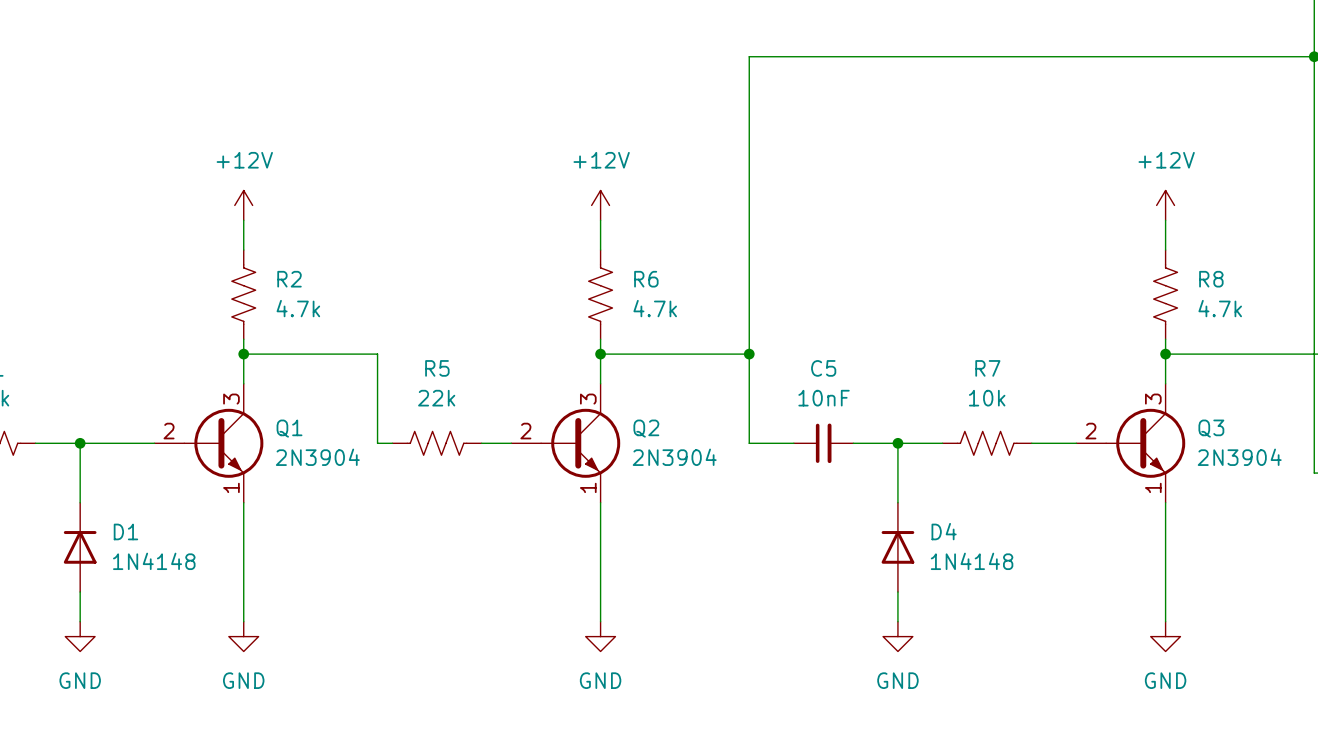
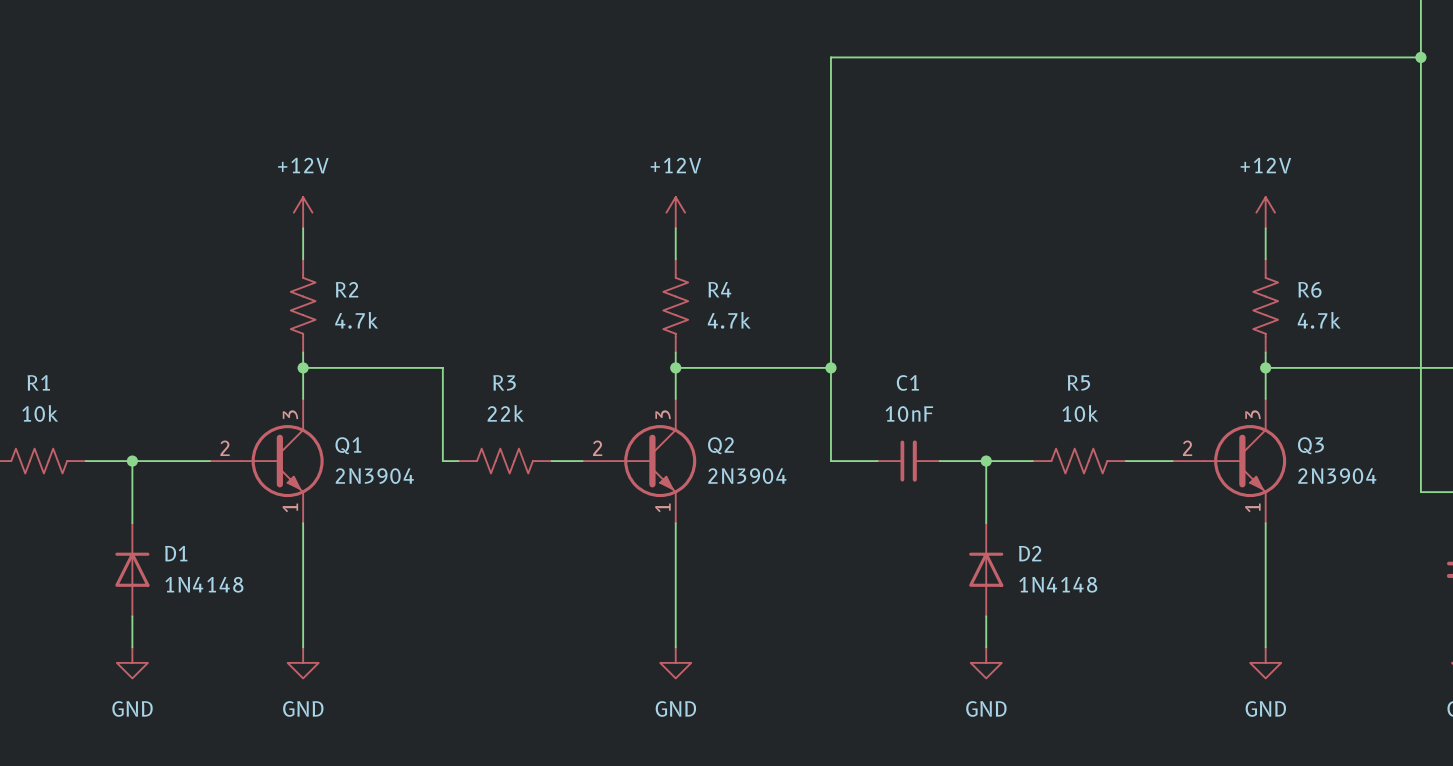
R6 name: R6 (646, 279) -> R4 (719, 289)
R8 name: R8 (1211, 279) -> R6 (1309, 289)
R5 name: R5 (437, 368) -> R3 (504, 382)
C5 name: C5 (823, 368) -> C1 (907, 382)
R7 name: R7 (987, 368) -> R5 (1078, 382)
D4 name: D4 (944, 531) -> D2 (1030, 553)

